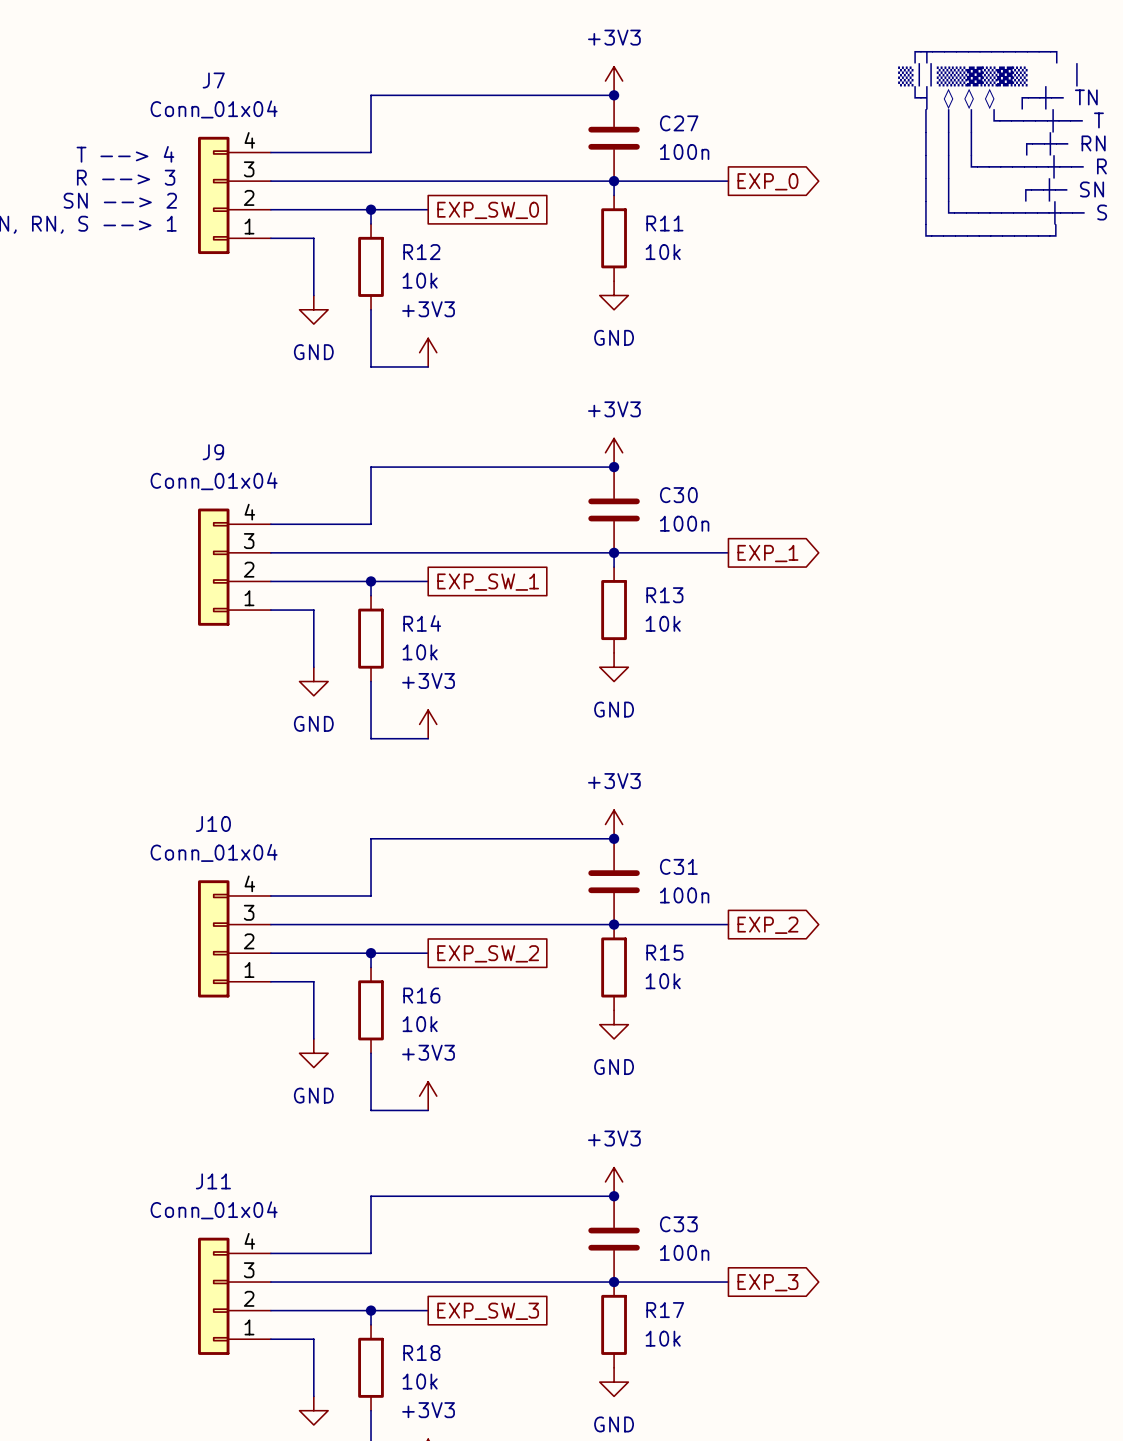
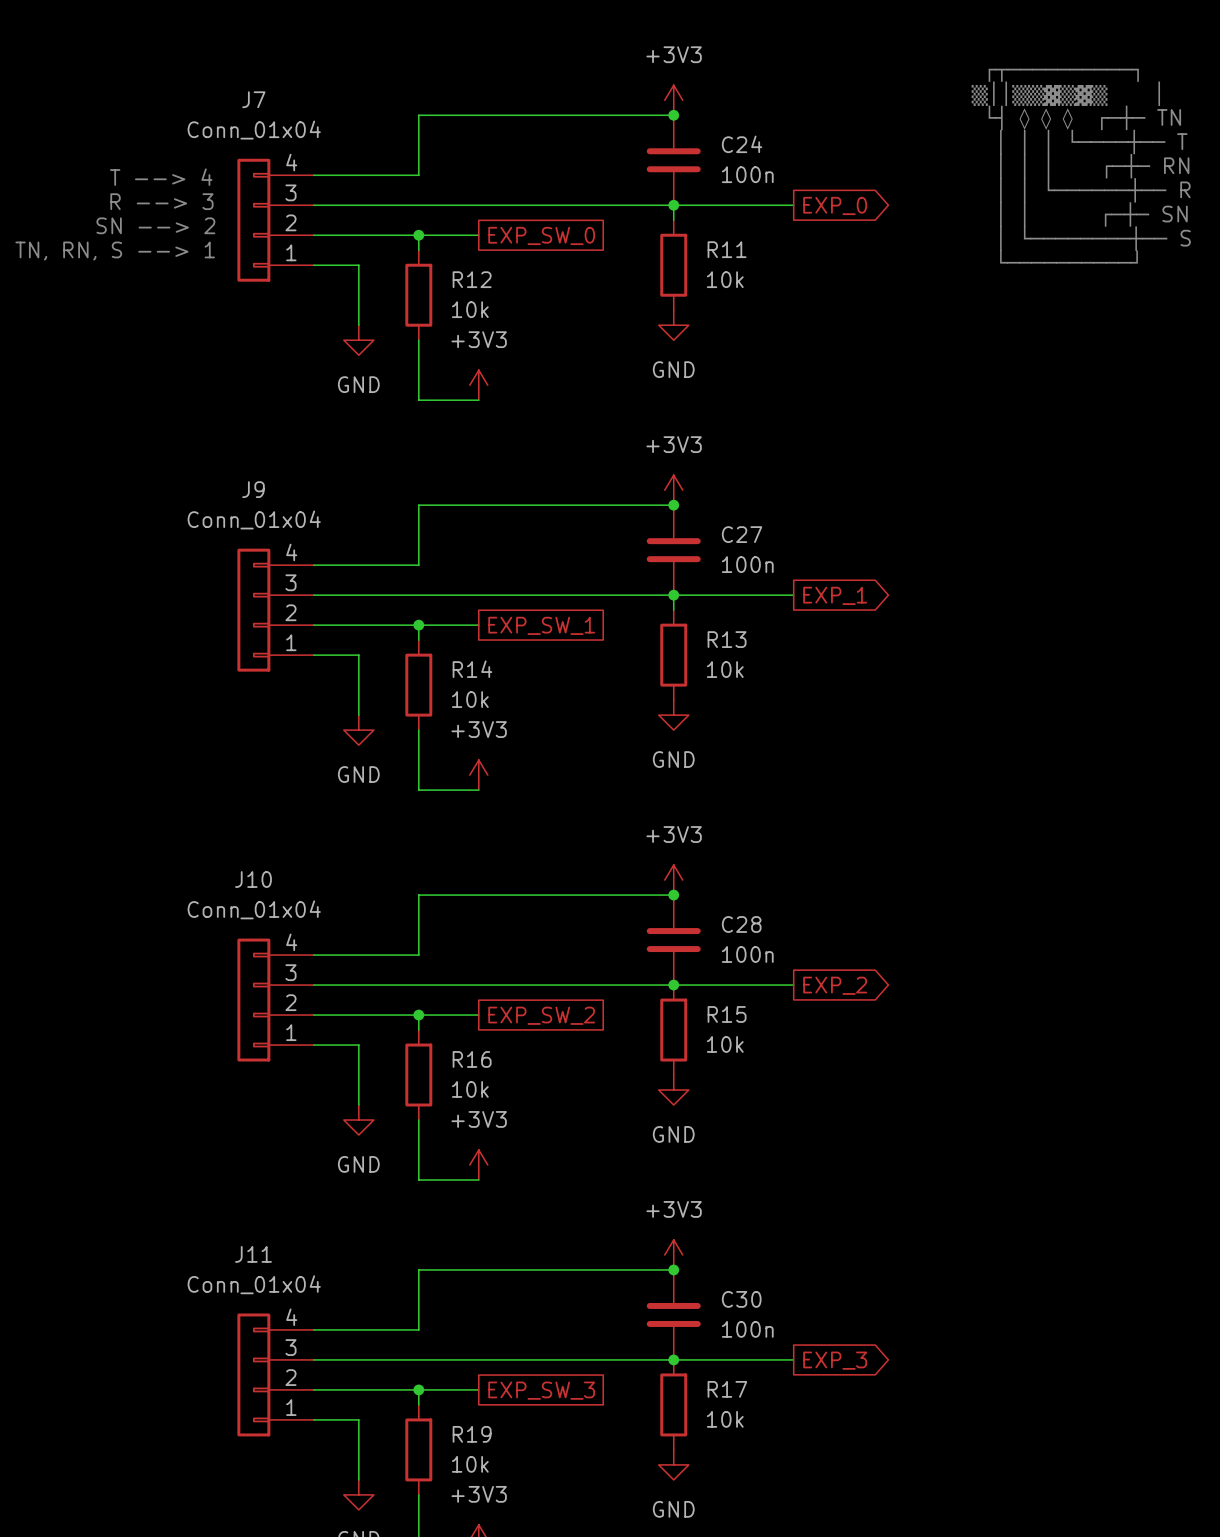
C27 name: C27 (679, 123) -> C24 (742, 144)
C30 name: C30 (678, 495) -> C27 (742, 534)
C31 name: C31 (678, 866) -> C28 (741, 924)
C33 name: C33 (678, 1224) -> C30 (741, 1299)
R18 name: R18 (421, 1352) -> R19 (472, 1434)

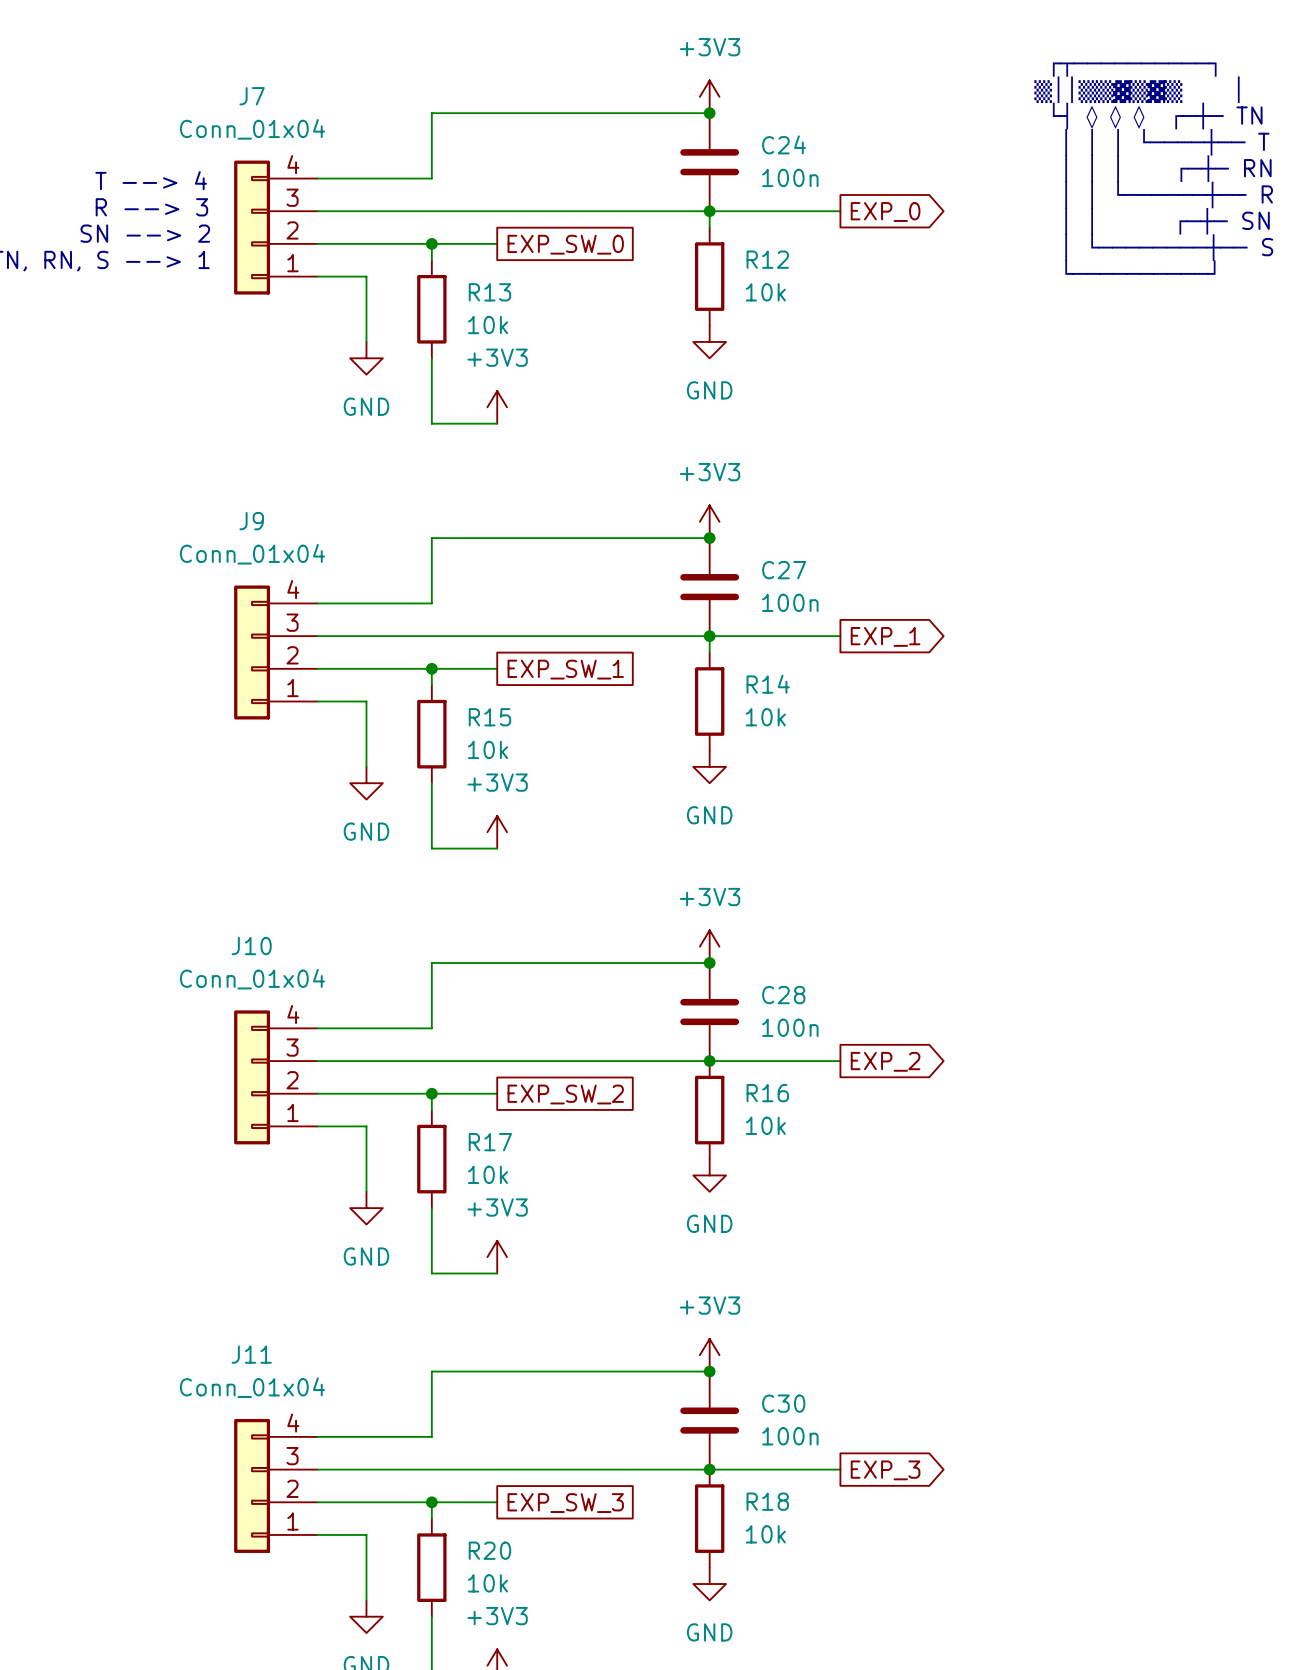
R11 name: R11 (727, 249) -> R12 (767, 259)
R12 name: R12 (472, 279) -> R13 (489, 292)
R13 name: R13 (727, 639) -> R14 (768, 684)
R14 name: R14 (472, 669) -> R15 (489, 717)
R15 name: R15 (727, 1014) -> R16 (767, 1093)
R16 name: R16 (472, 1059) -> R17 (490, 1142)
R17 name: R17 (727, 1389) -> R18 (767, 1501)
R19 name: R19 (472, 1434) -> R20 (489, 1550)

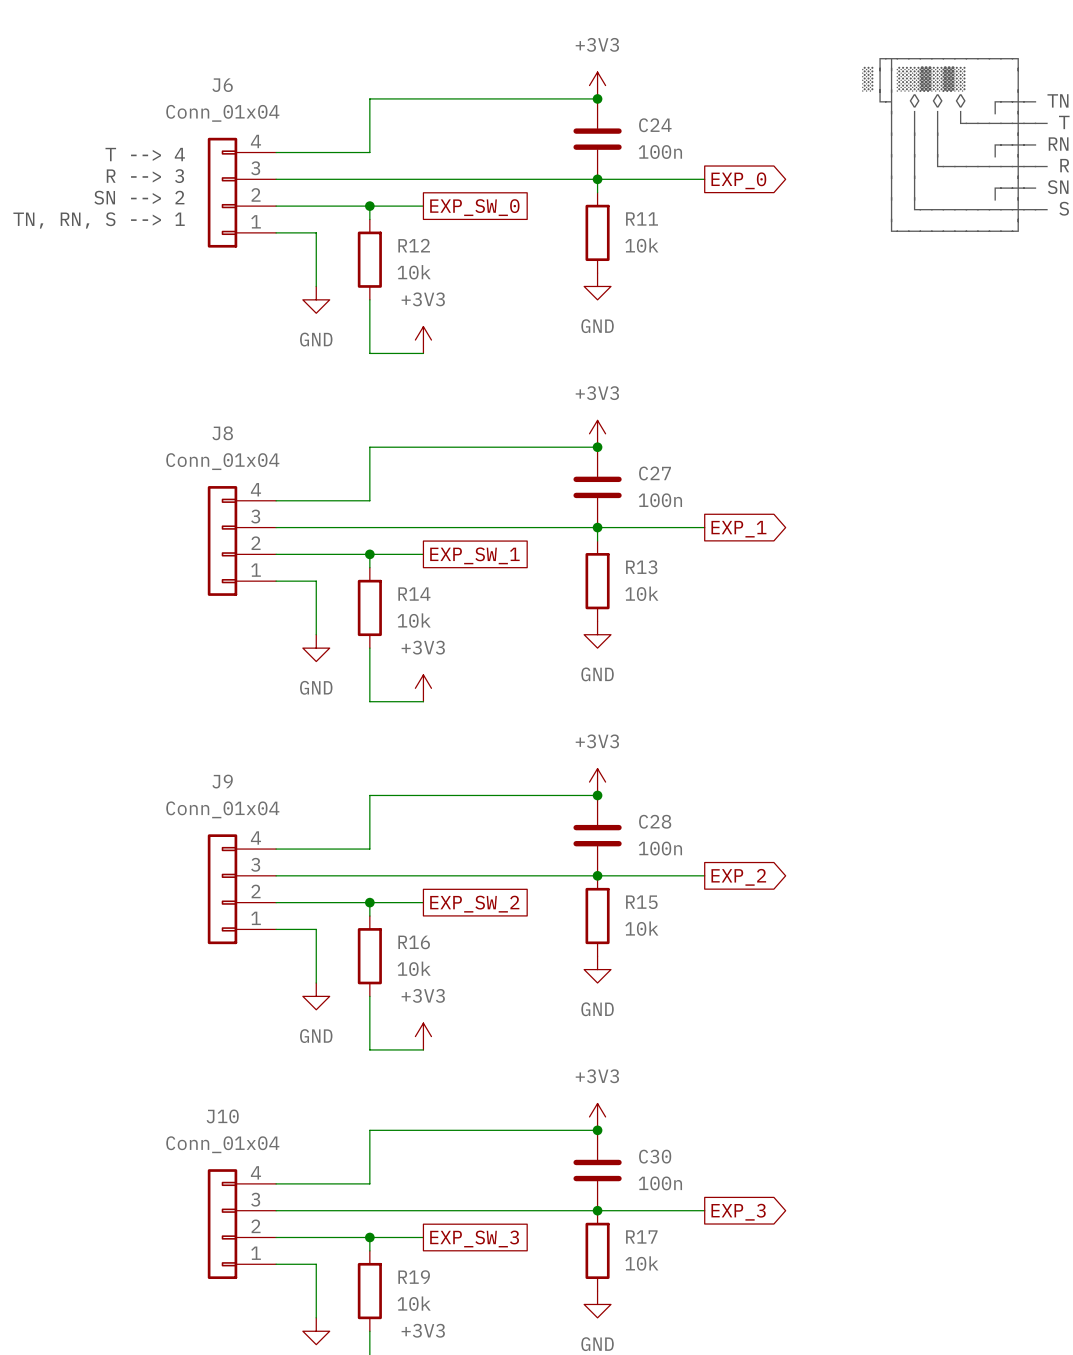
J7 name: J7 (252, 96) -> J6 (222, 85)
R12 name: R12 (767, 259) -> R11 (642, 218)
R13 name: R13 (489, 292) -> R12 (414, 245)
J9 name: J9 (251, 521) -> J8 (222, 433)
R14 name: R14 (768, 684) -> R13 (641, 567)
R15 name: R15 (489, 717) -> R14 (414, 594)
J10 name: J10 (251, 946) -> J9 (222, 781)
R16 name: R16 (767, 1093) -> R15 (641, 902)
R17 name: R17 (490, 1142) -> R16 (414, 942)
J11 name: J11 (251, 1354) -> J10 (222, 1116)
R18 name: R18 (767, 1501) -> R17 (641, 1236)
R20 name: R20 (489, 1550) -> R19 (414, 1277)

